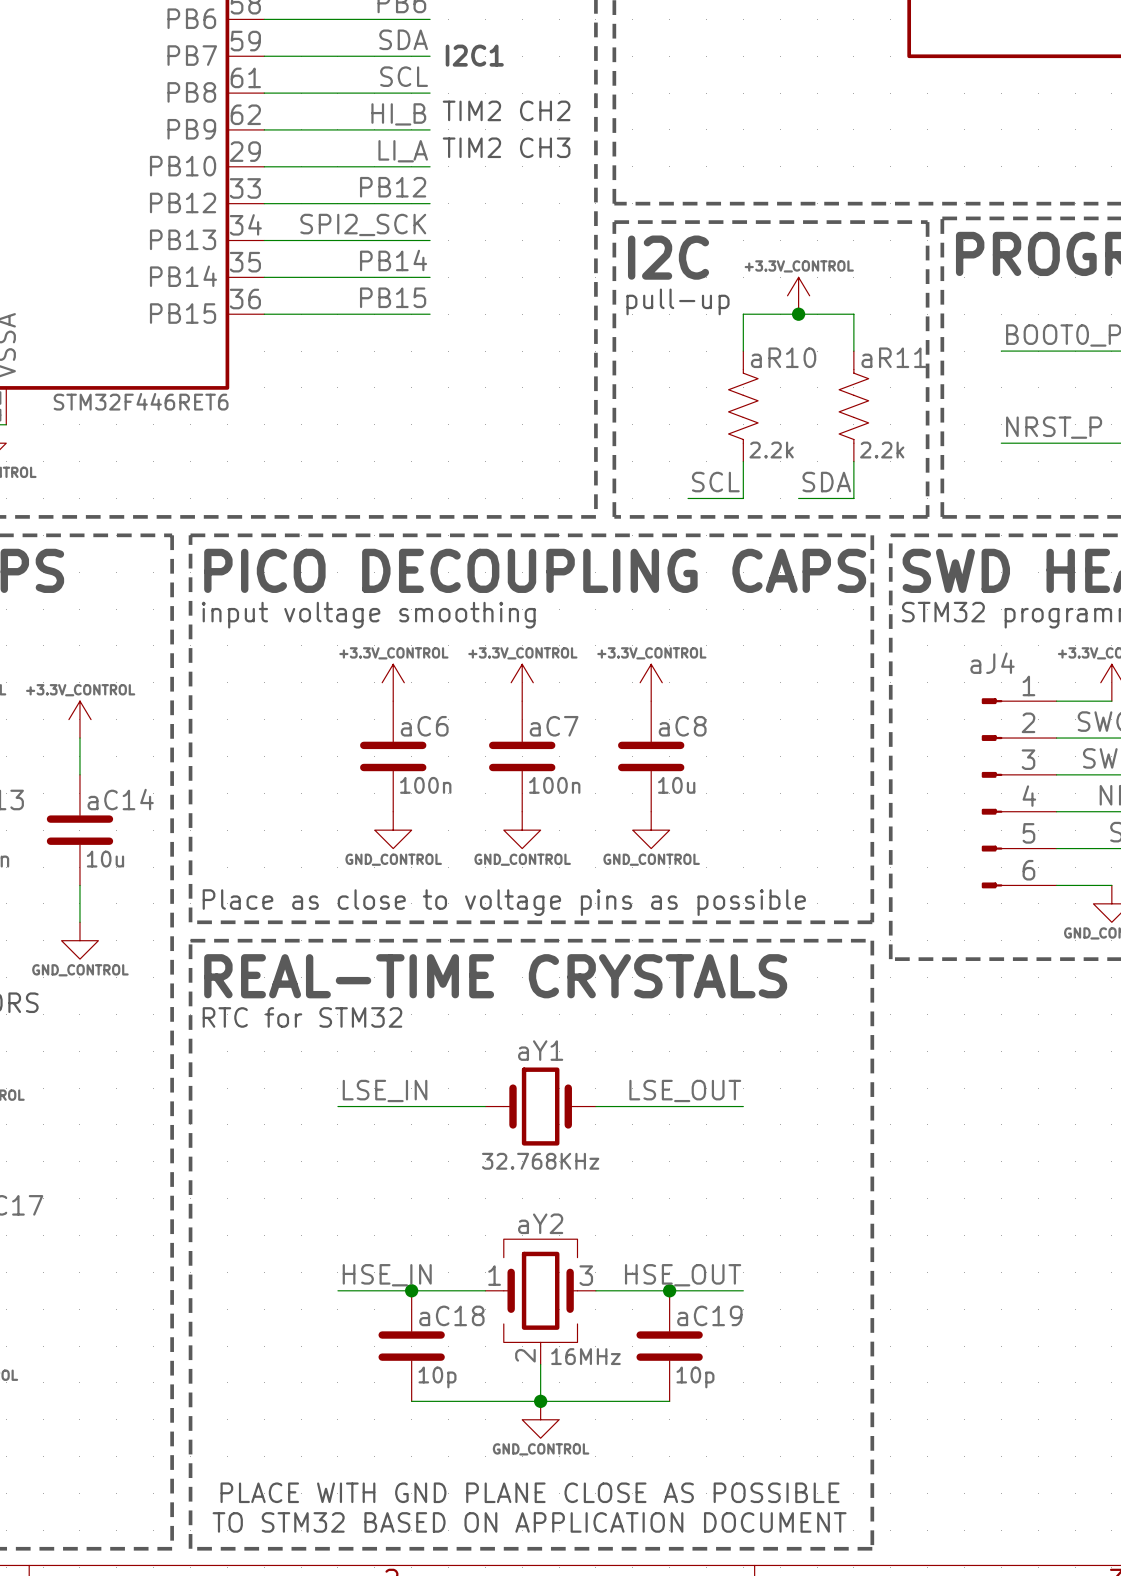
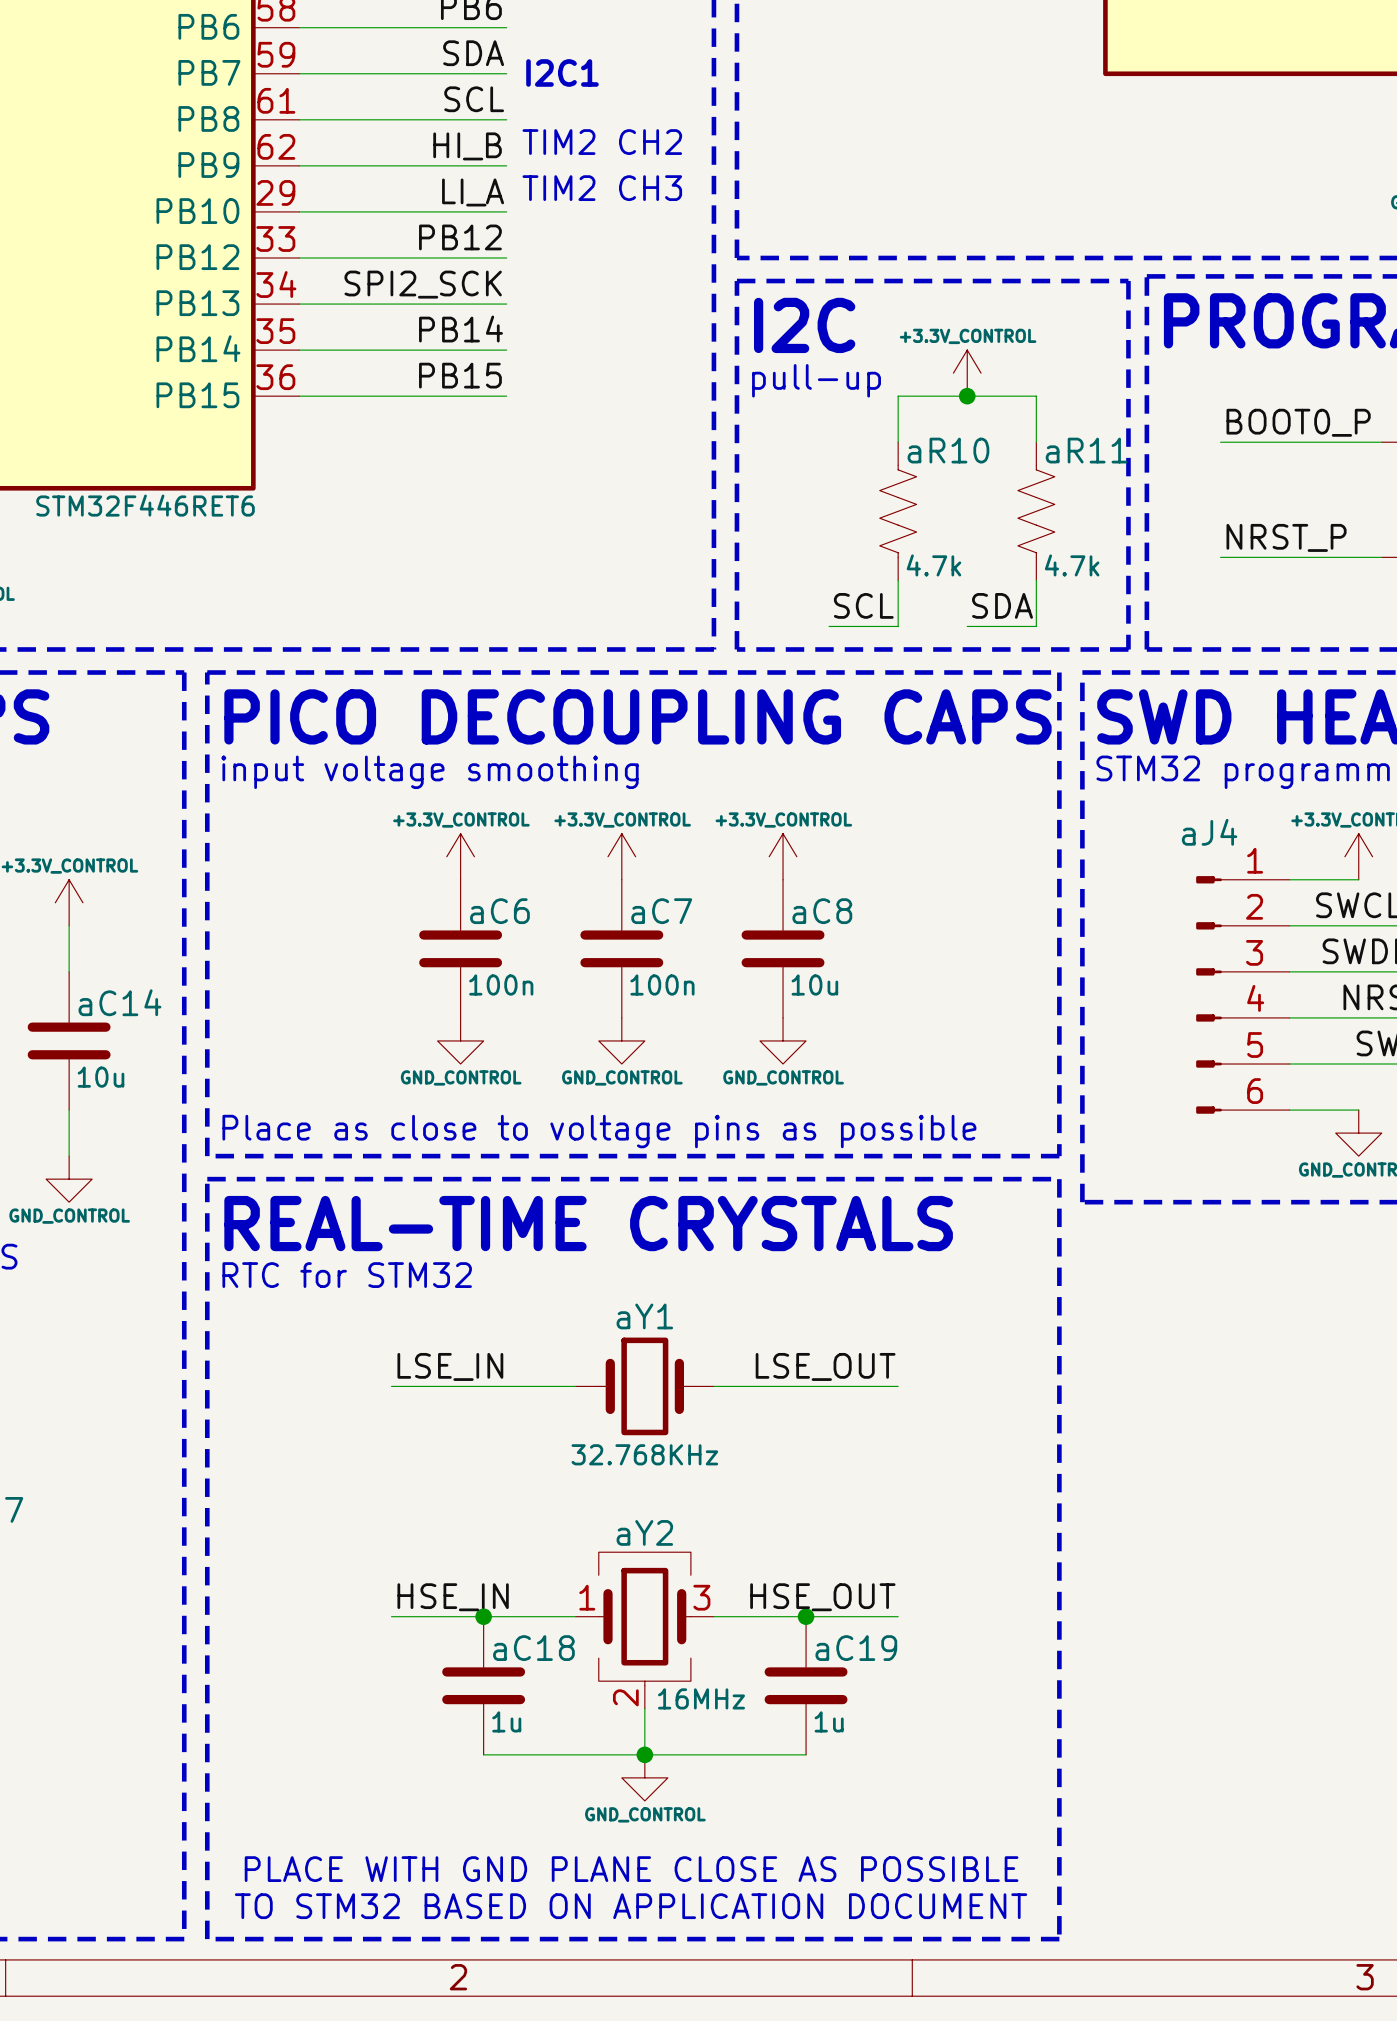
aR10 value: 2.2k (771, 450) -> 4.7k (933, 565)
aR11 value: 2.2k (882, 450) -> 4.7k (1072, 565)
aC18 value: 10p (437, 1377) -> 1u (506, 1721)
aC19 value: 10p (695, 1377) -> 1u (829, 1721)

